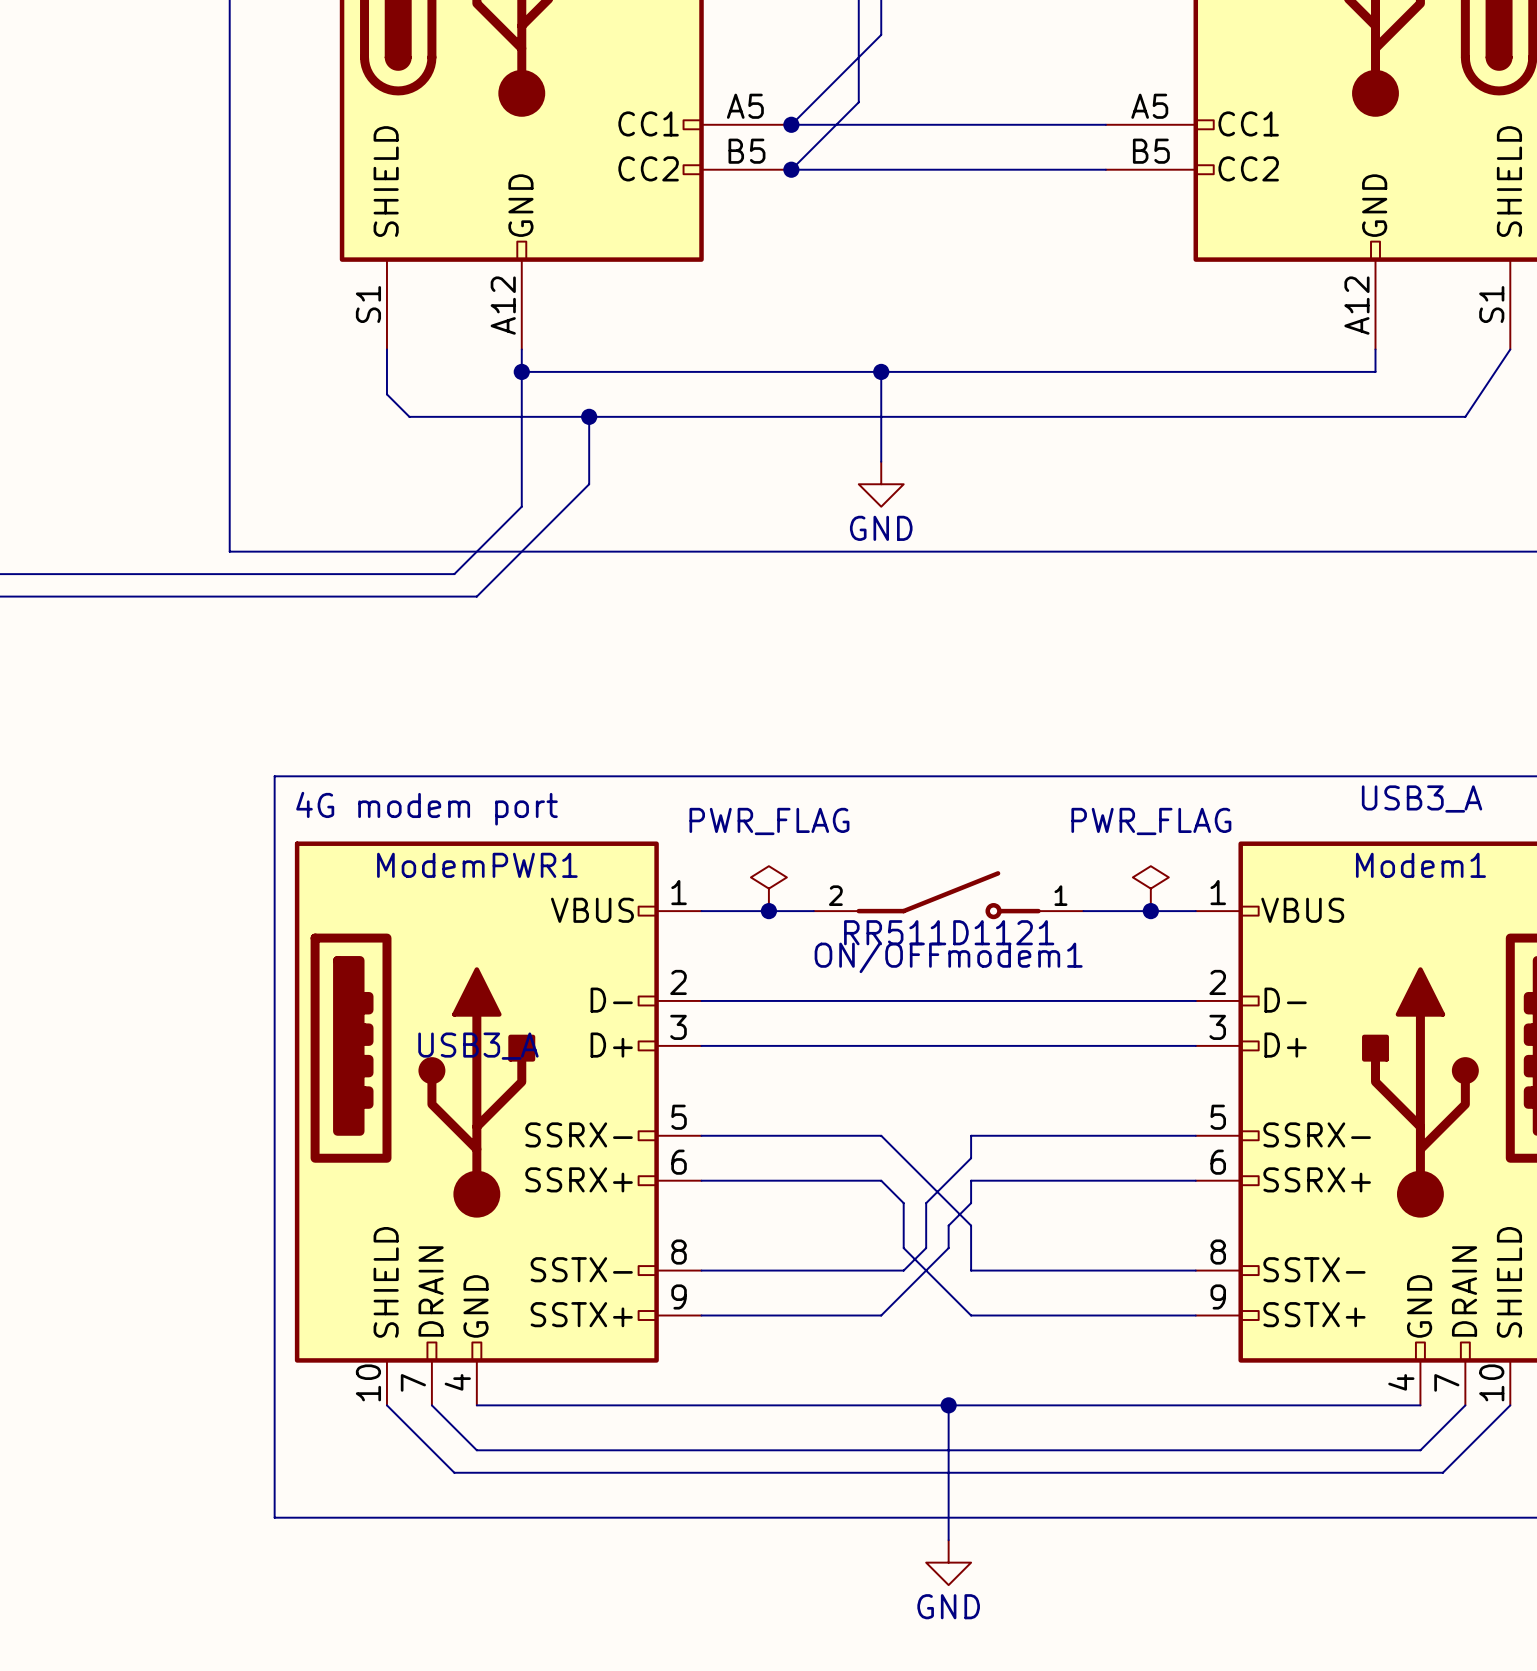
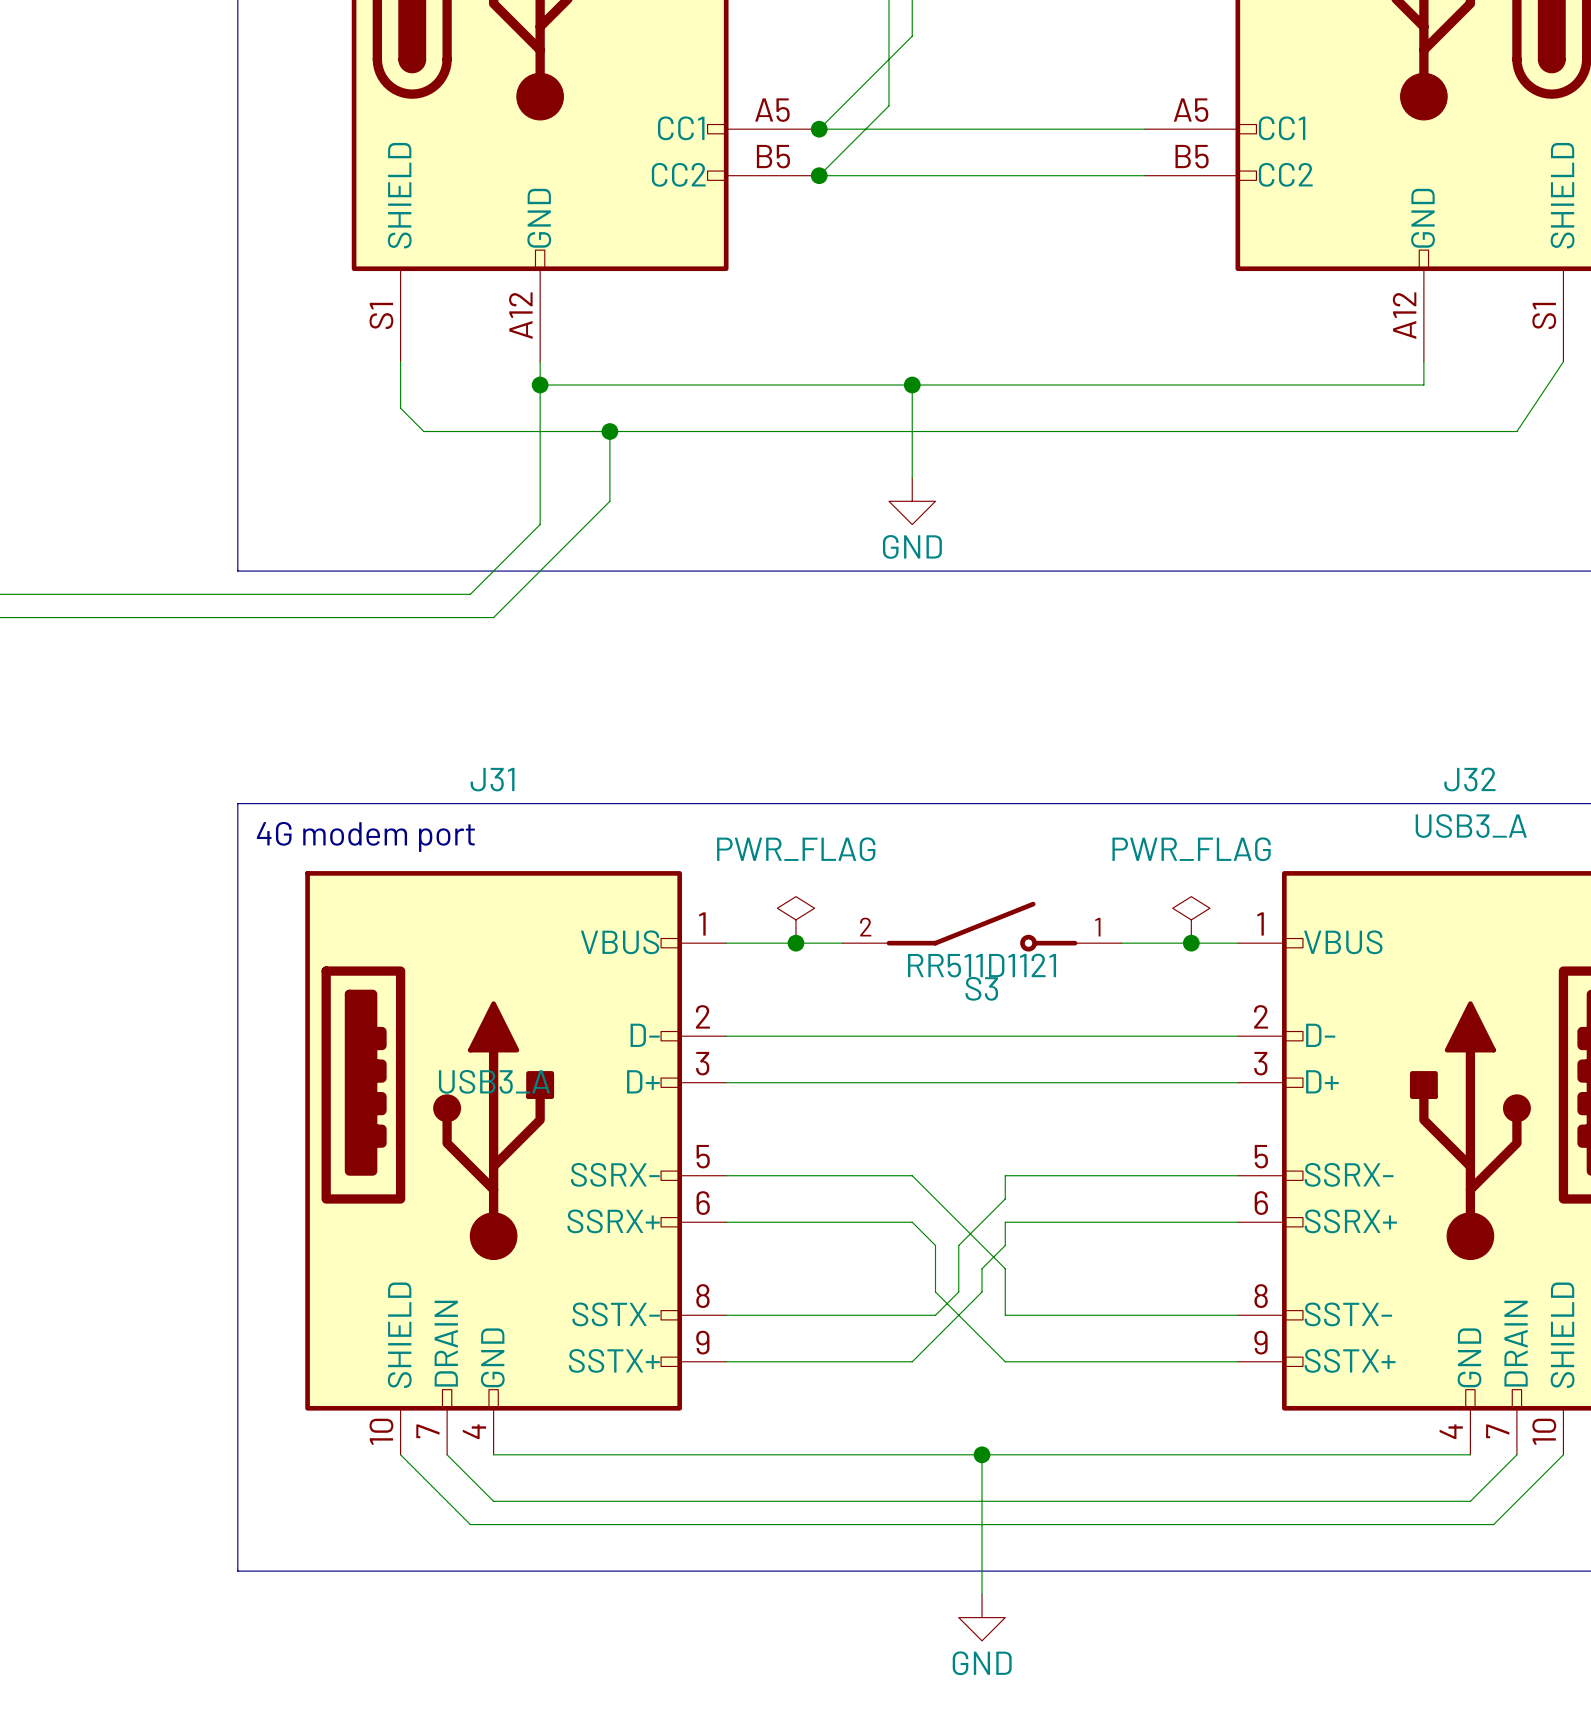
line: (274, 776) (274, 1517) -> (284, 803) (237, 803) (237, 1571) (284, 1571)
text position: 4G modem port (427, 808) -> 4G modem port (365, 836)
ModemPWR1 name: ModemPWR1 (477, 865) -> J31 (492, 779)
Modem1 name: Modem1 (1420, 865) -> J32 (1469, 779)
ON/OFFmodem1 name: ON/OFFmodem1 (948, 957) -> S3 (981, 988)

